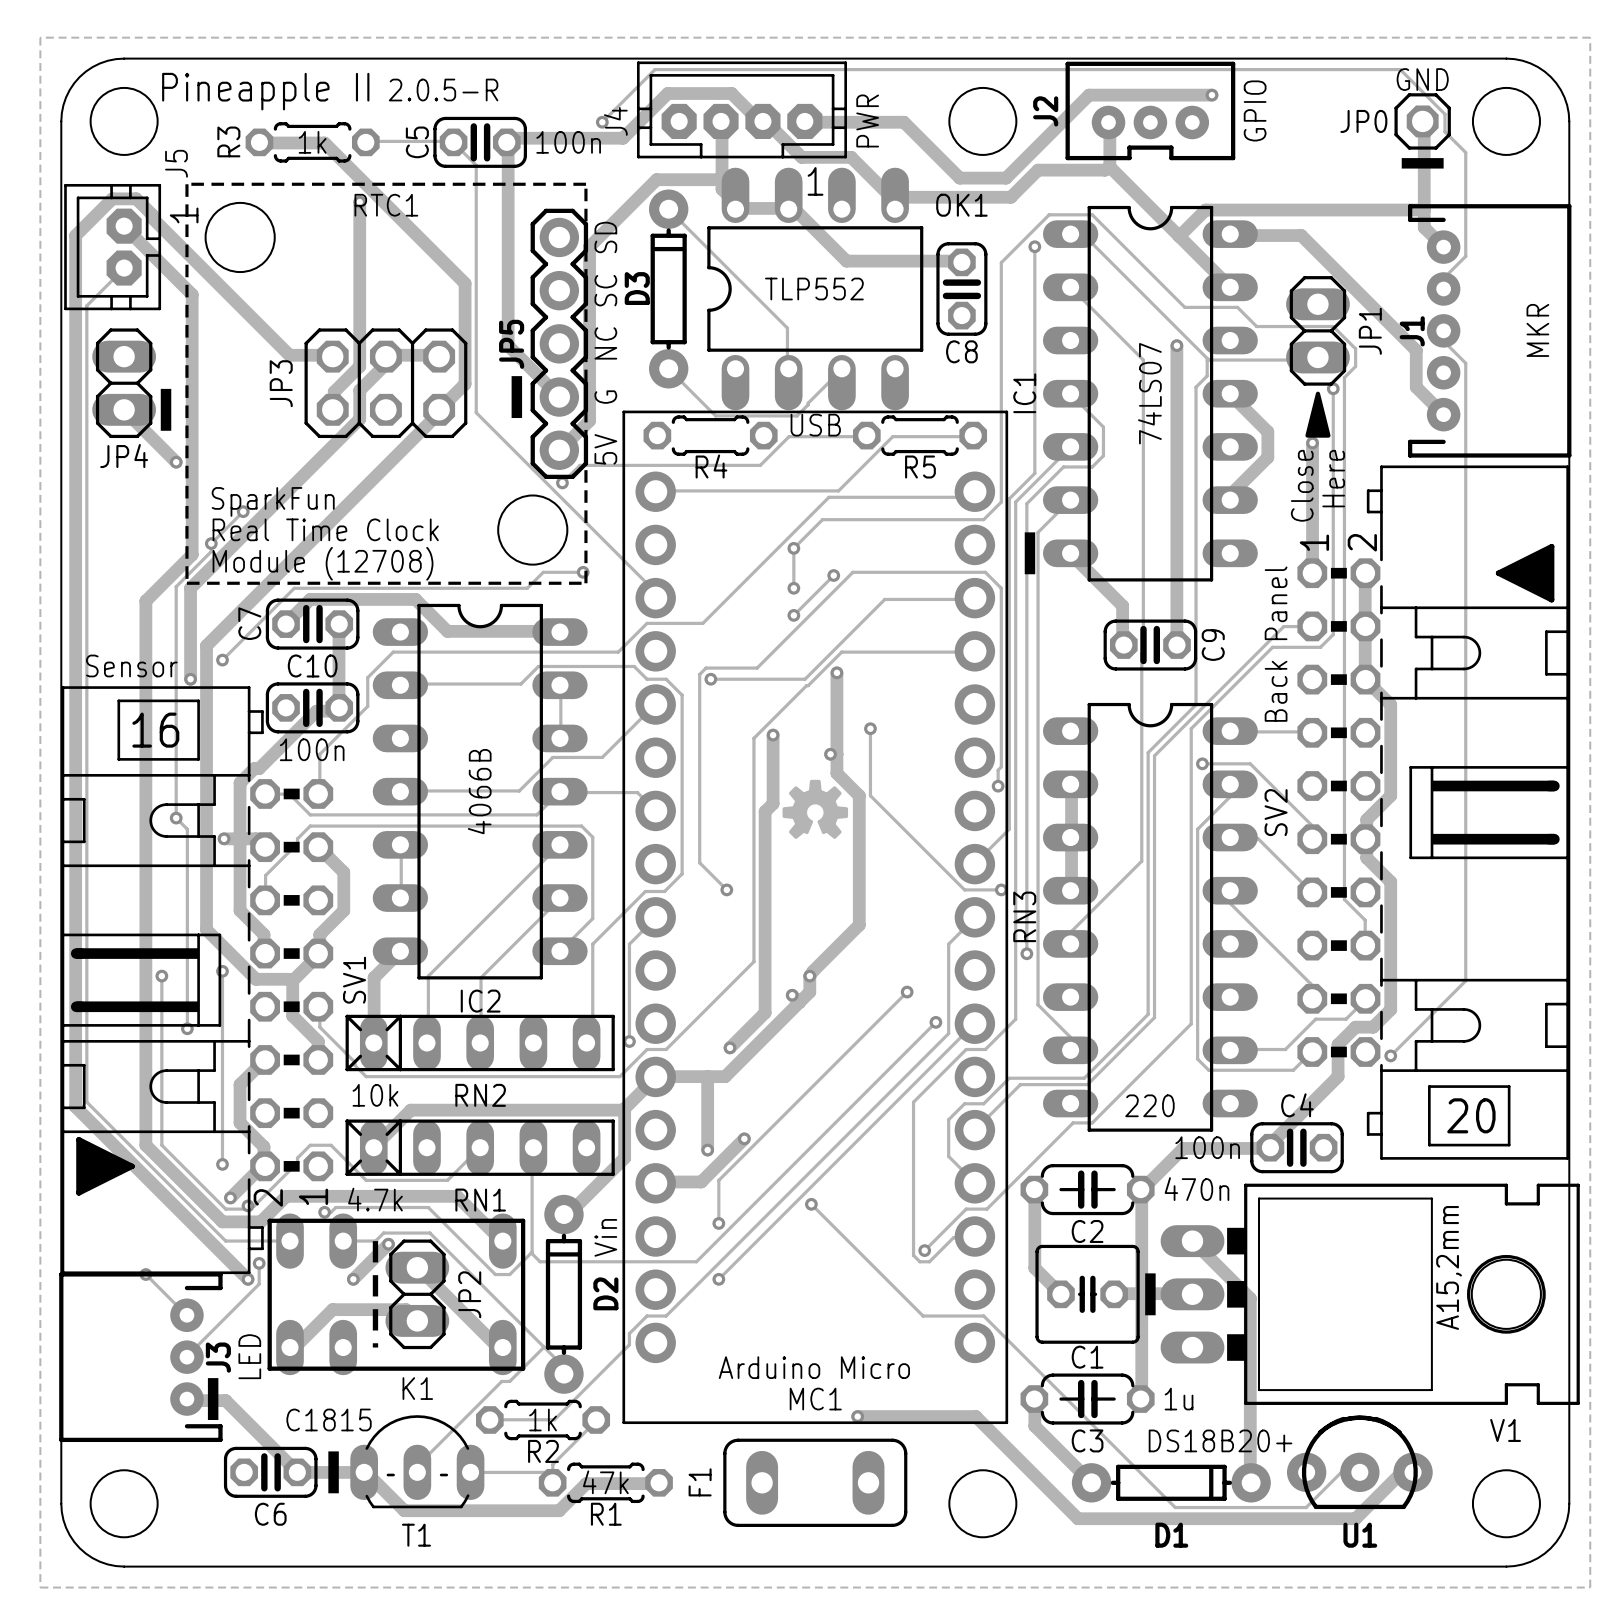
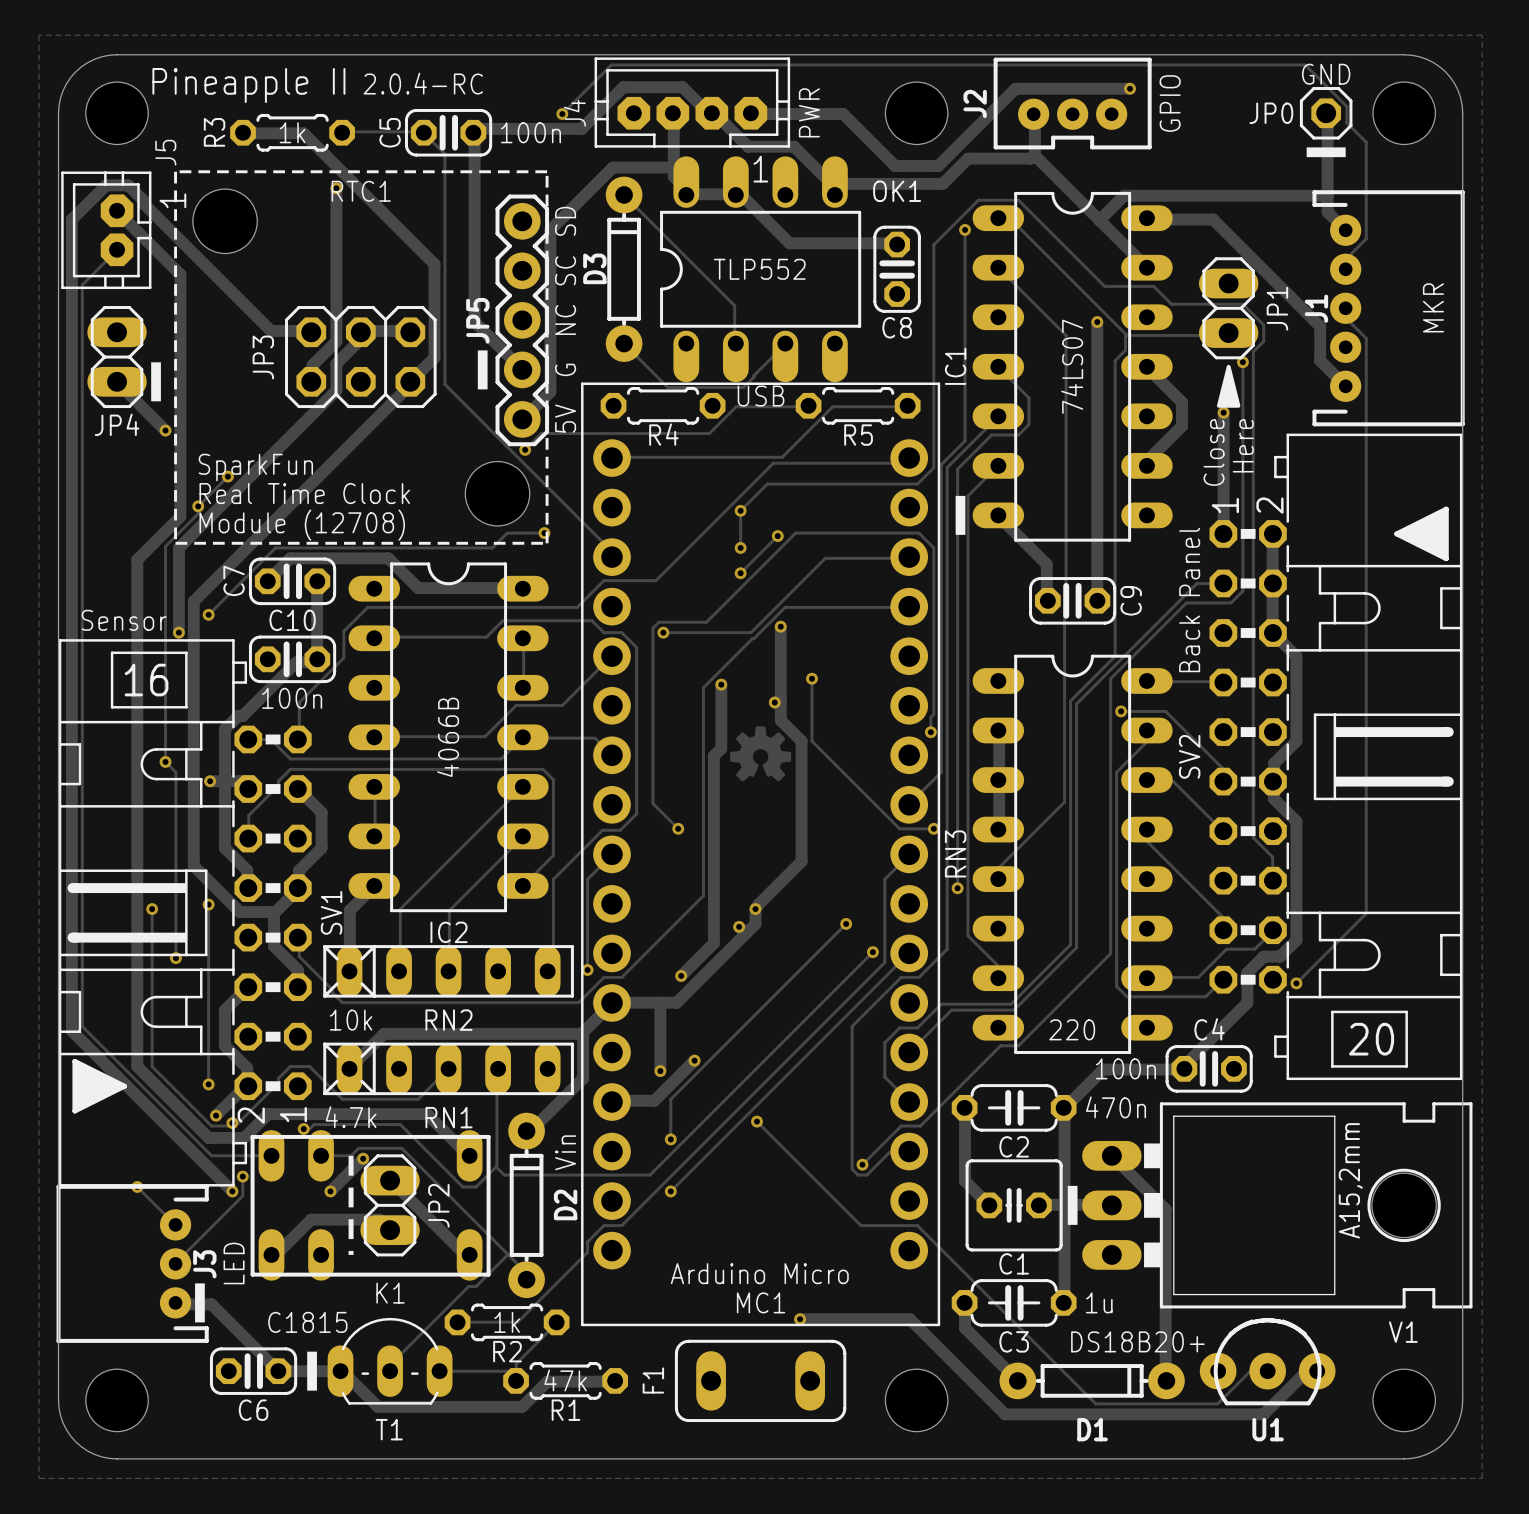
text: 2.0.5-R (443, 90) -> 2.0.4-RC (423, 83)

